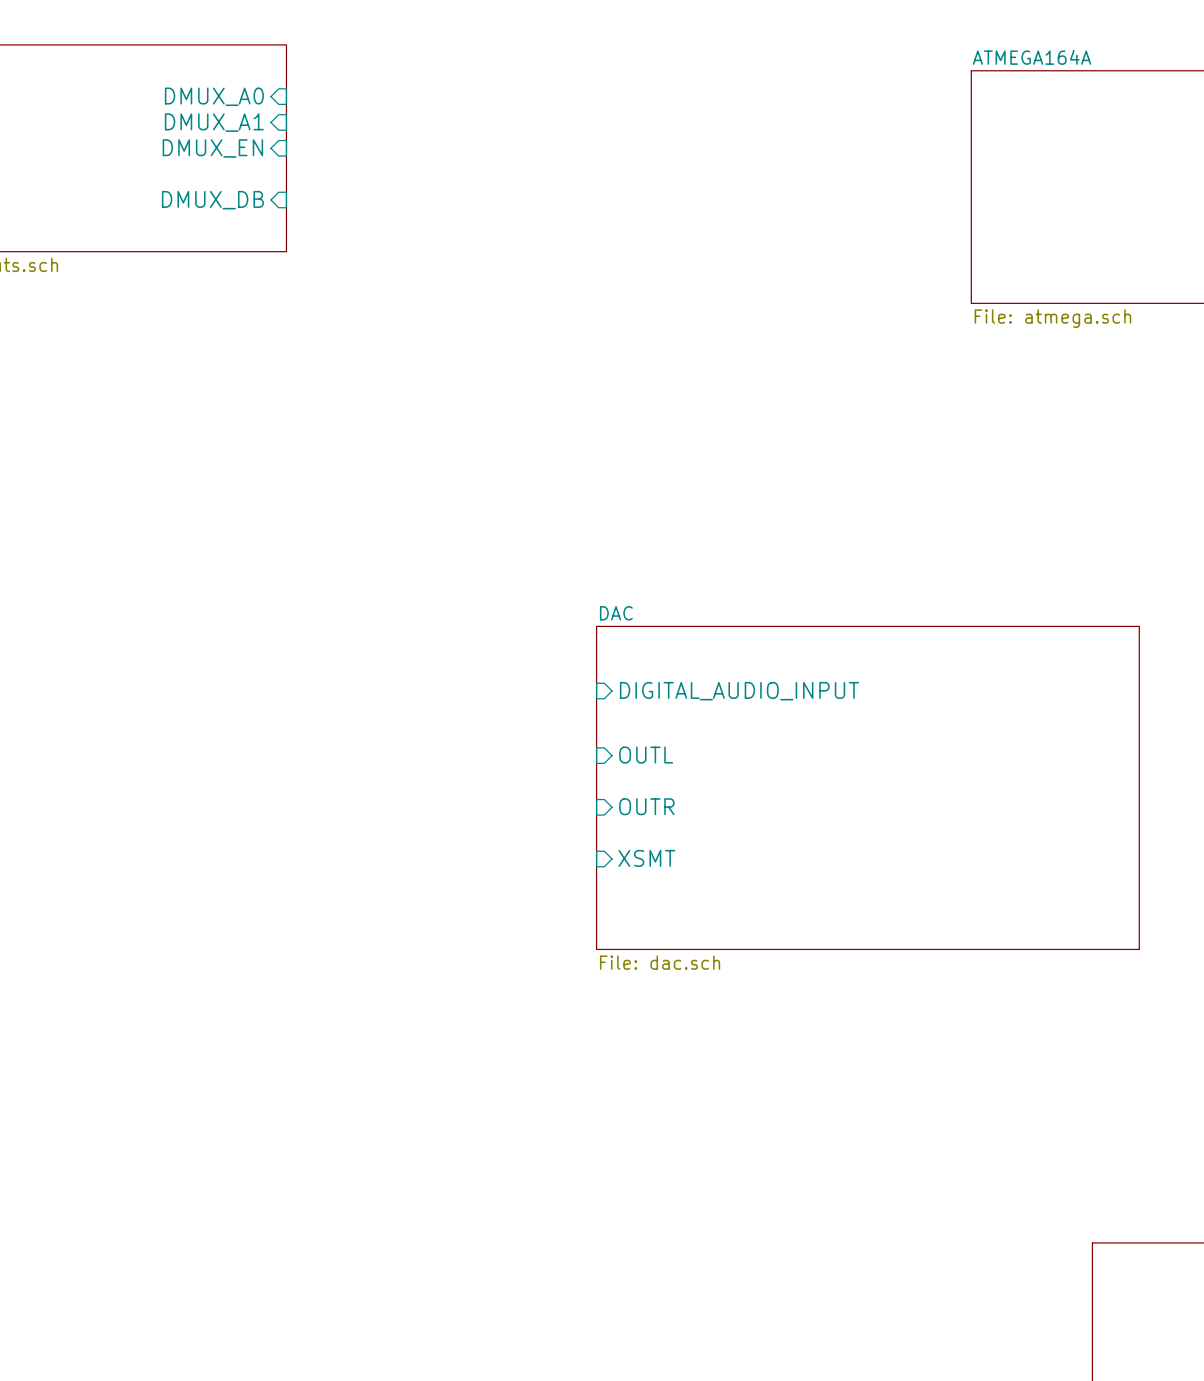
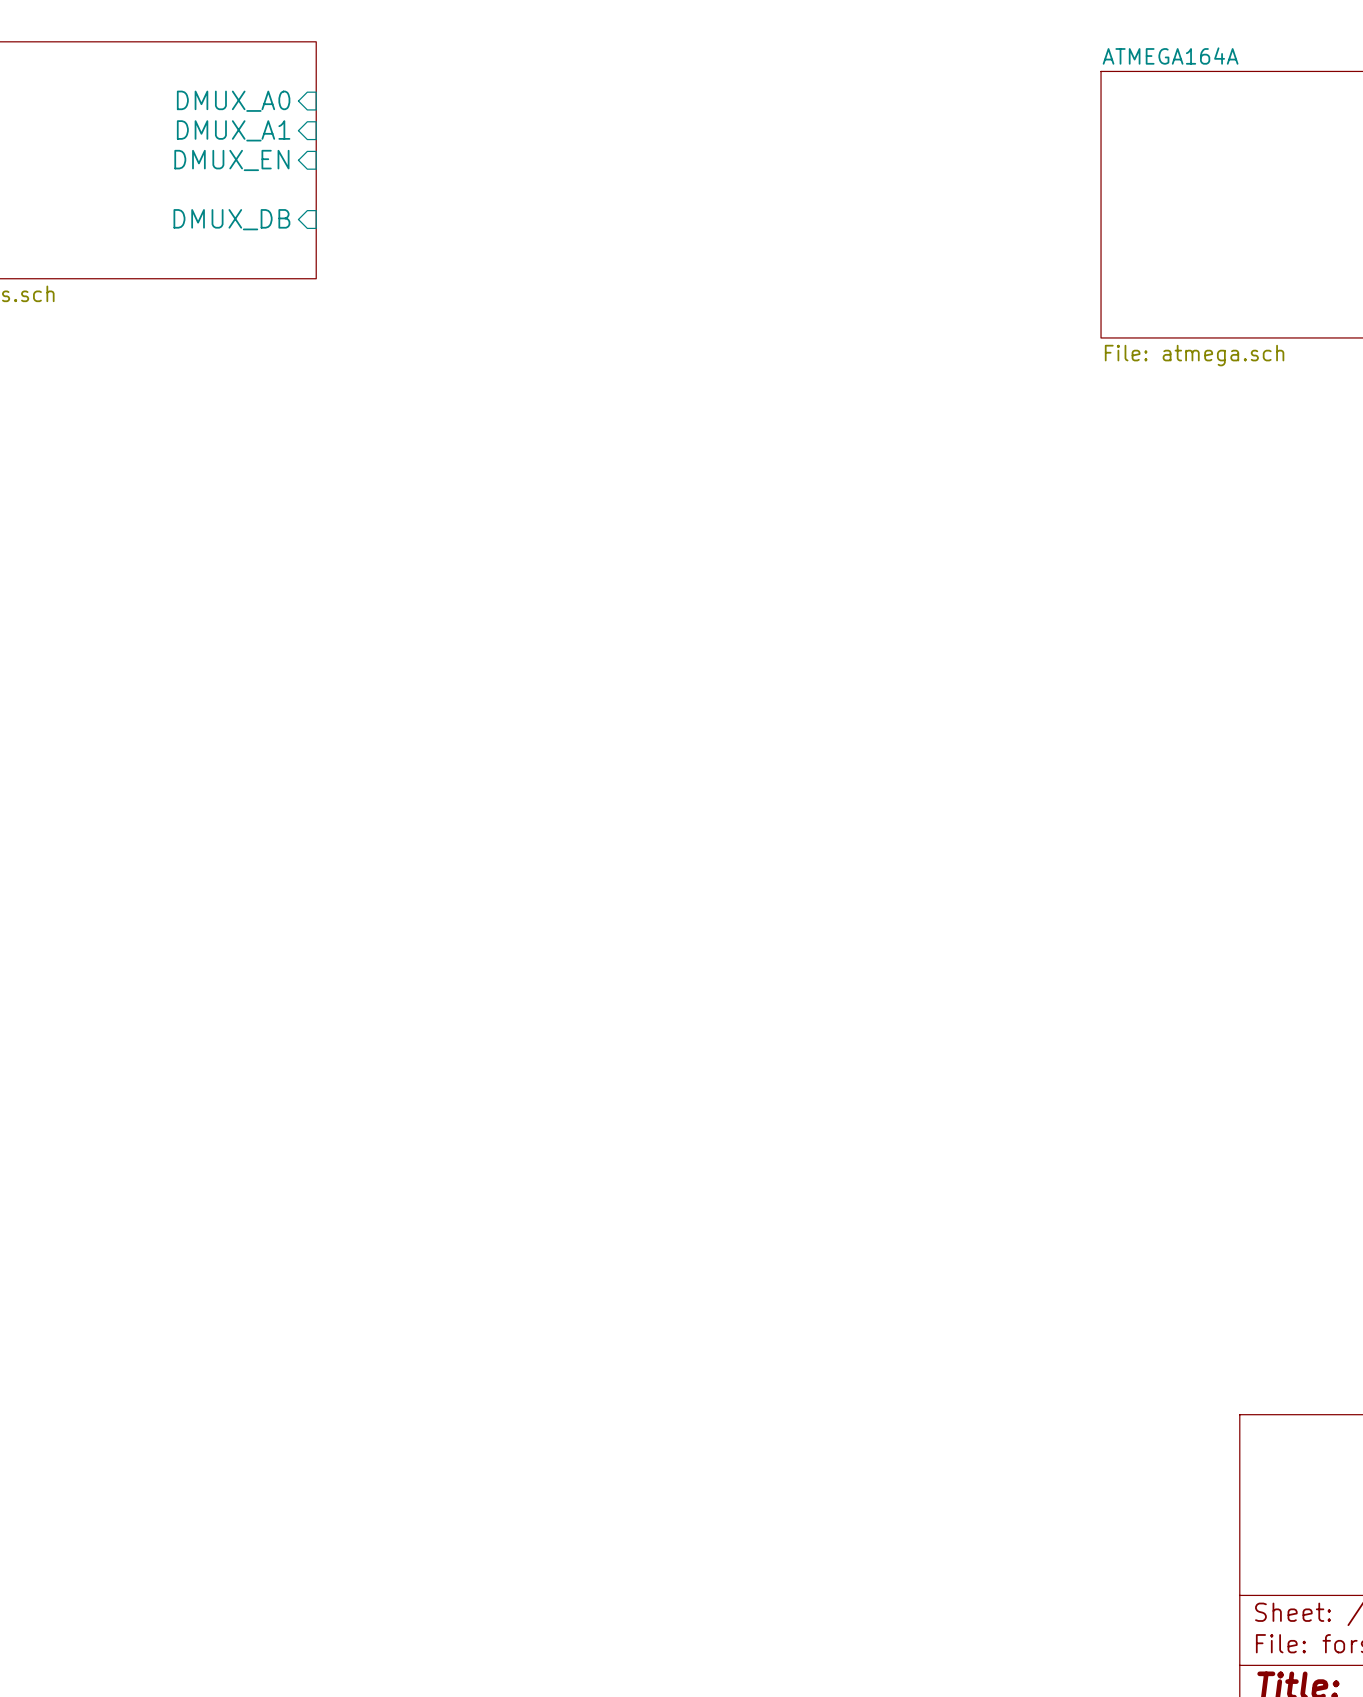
sheet pin: DIGITAL_AUDIO_INPUT (739, 691) -> none
sheet pin: OUTL (646, 755) -> none
sheet DAC: File: dac.sch (867, 787) -> none
sheet pin: OUTR (646, 806) -> none
sheet pin: XSMT (646, 858) -> none

